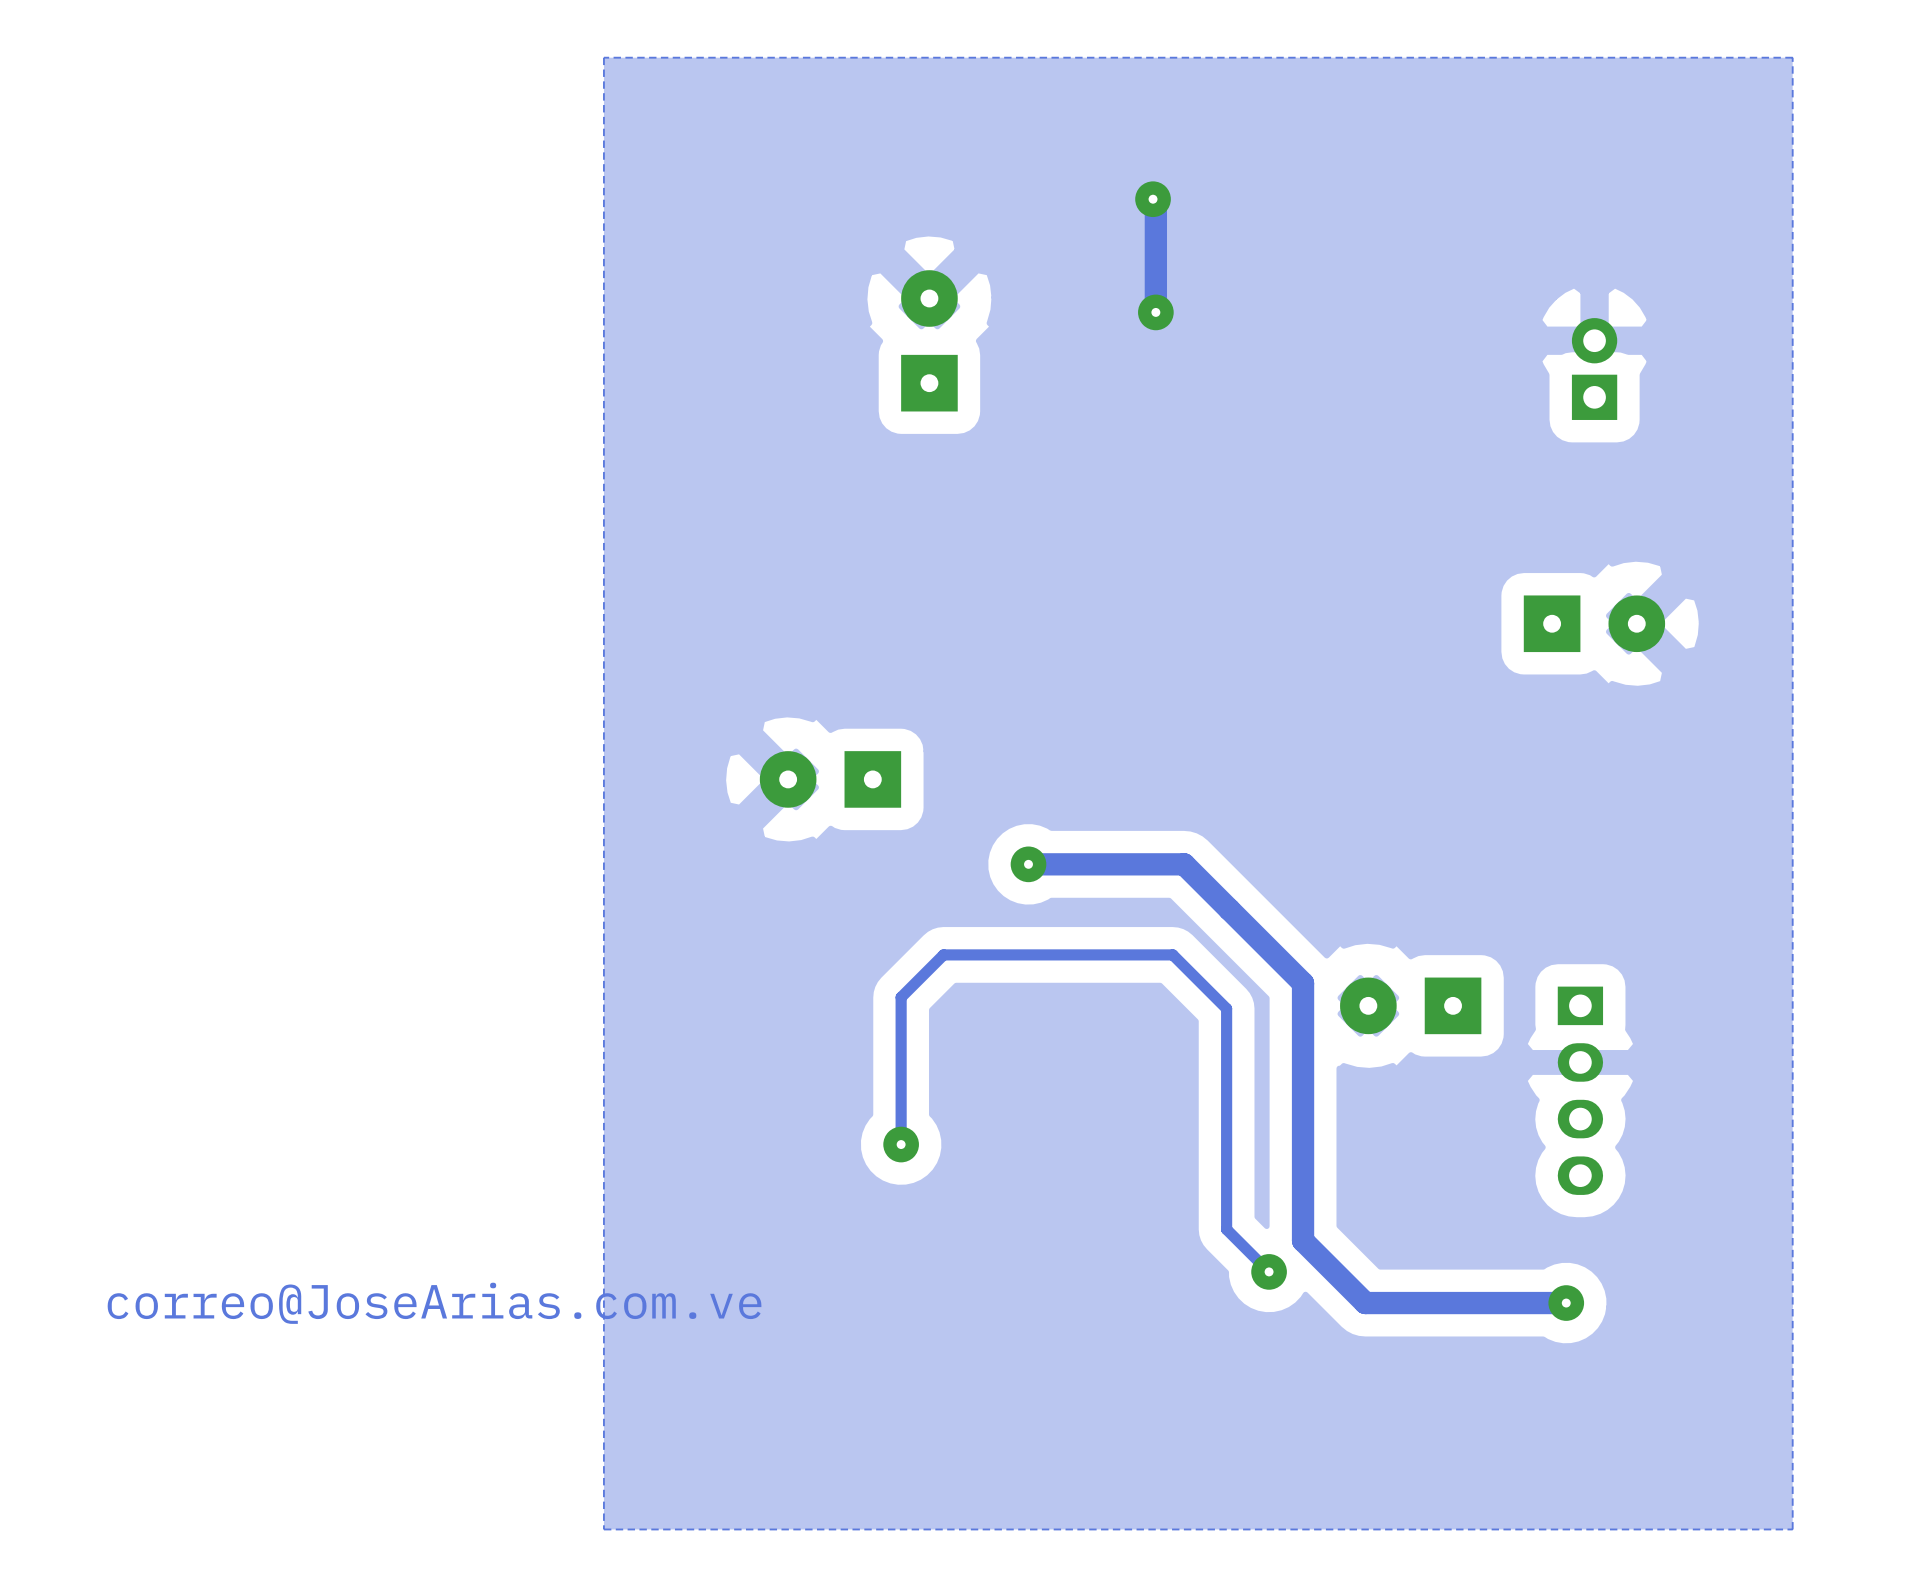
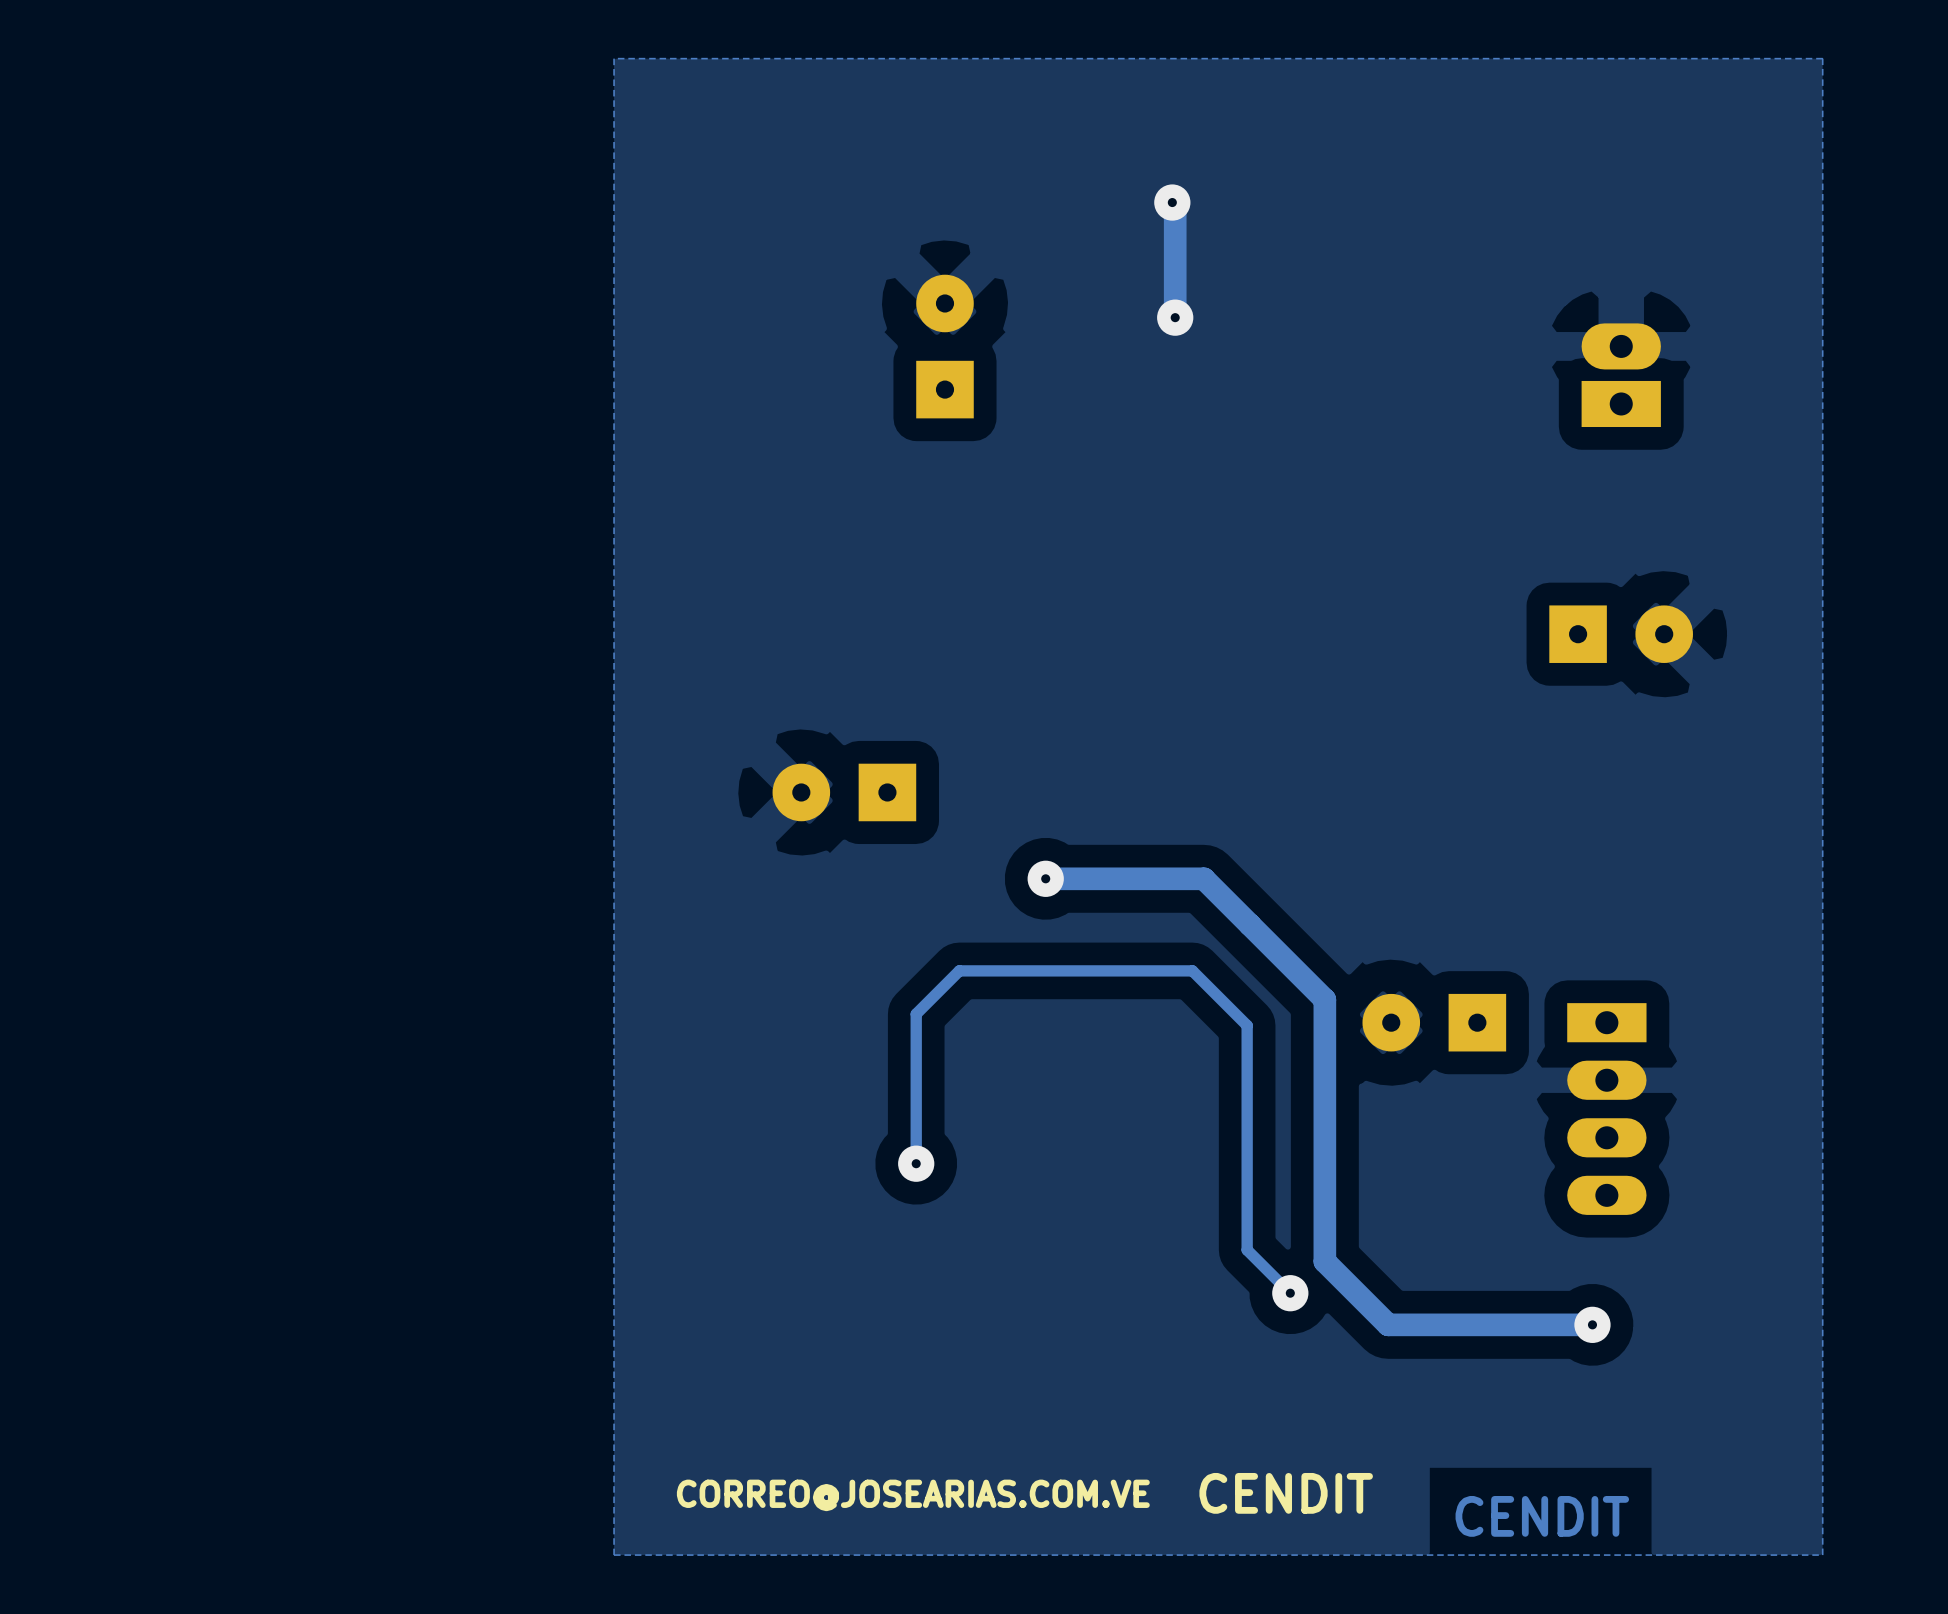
part footprint: [1571, 318, 1618, 420] -> [1581, 323, 1661, 428]
part footprint: [1557, 986, 1604, 1195] -> [1567, 1003, 1647, 1215]
text: correo@JoseArias.com.ve (434, 1303) -> none
text: none -> CENDIT (1286, 1493)
text: none -> CORREO@JOSEARIAS.COM.VE (913, 1495)
text: none -> CENDIT (1542, 1516)

